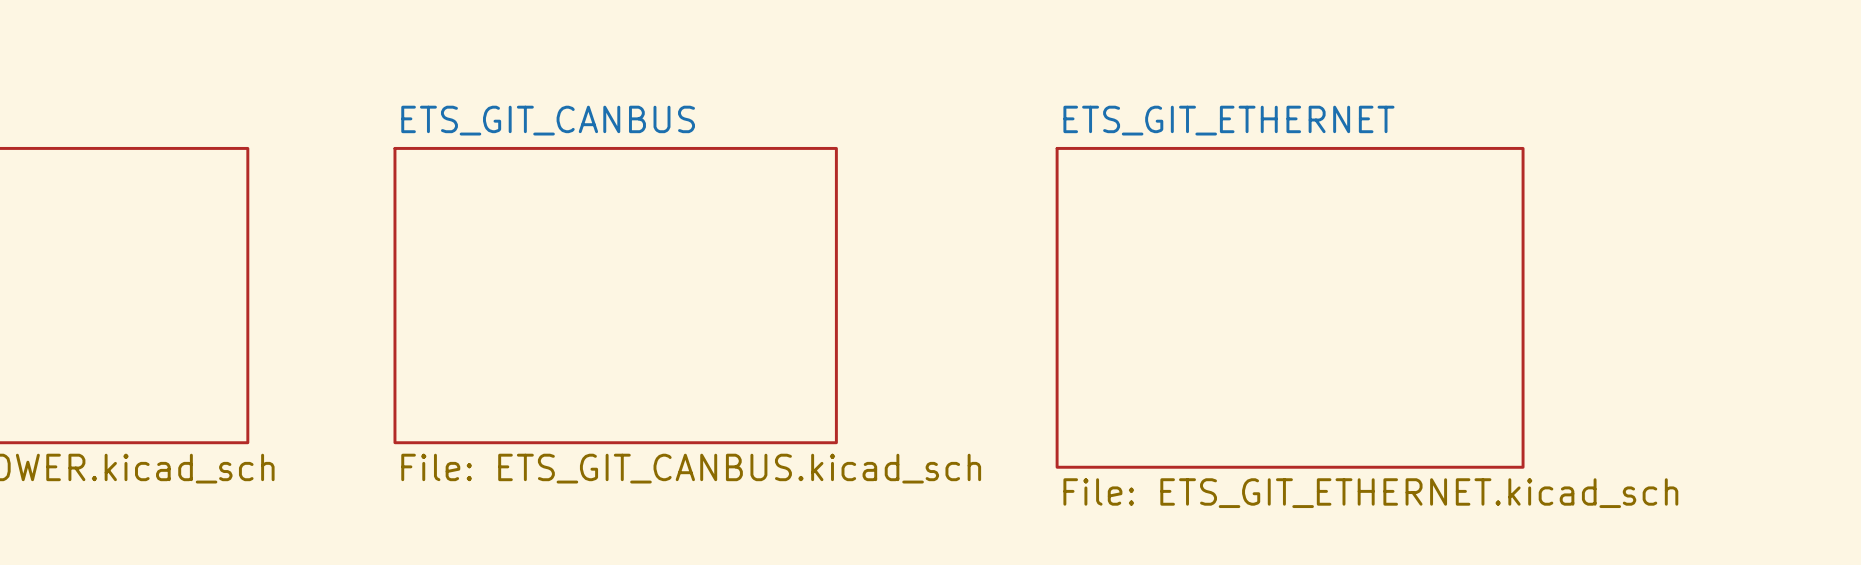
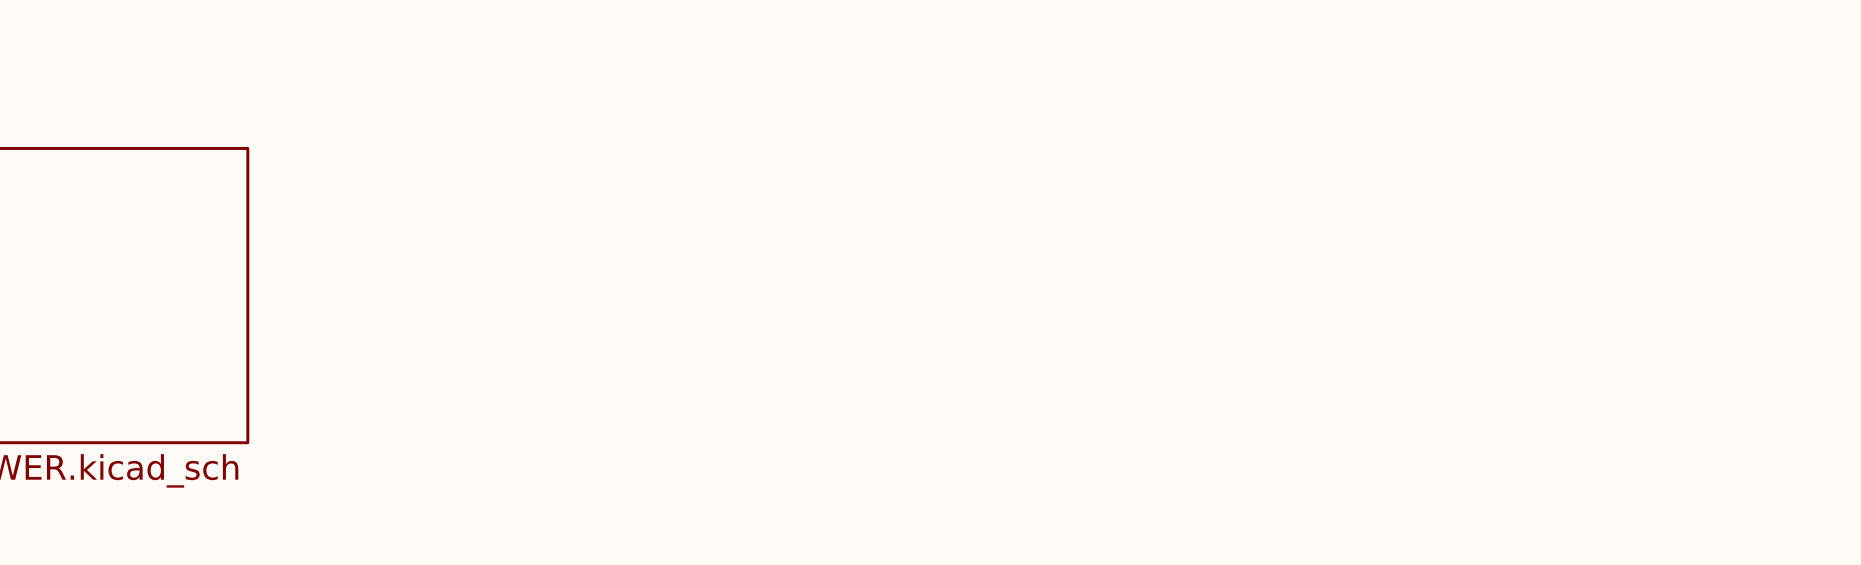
sheet ETS_GIT_CANBUS: File: ETS_GIT_CANBUS.kicad_sch (615, 295) -> none
sheet ETS_GIT_ETHERNET: File: ETS_GIT_ETHERNET.kicad_sch (1290, 307) -> none

